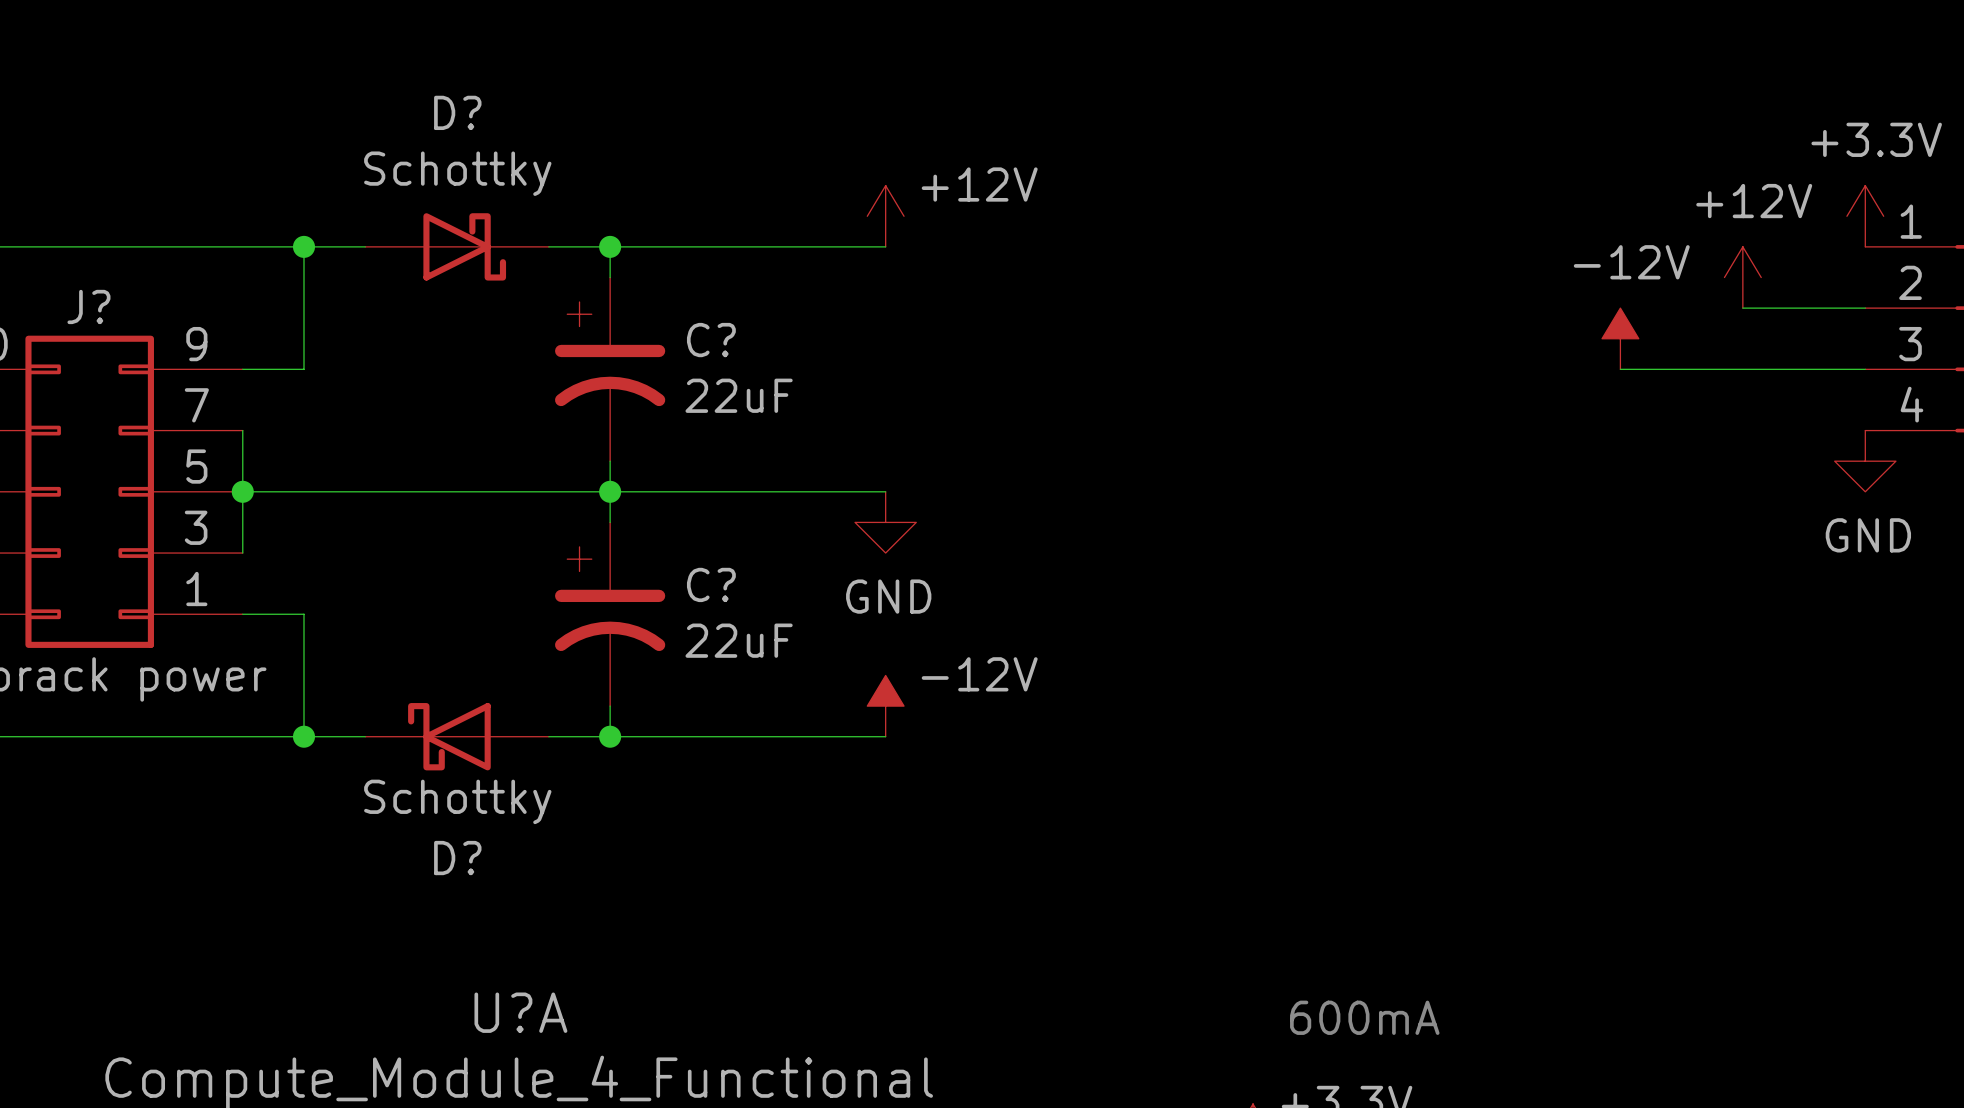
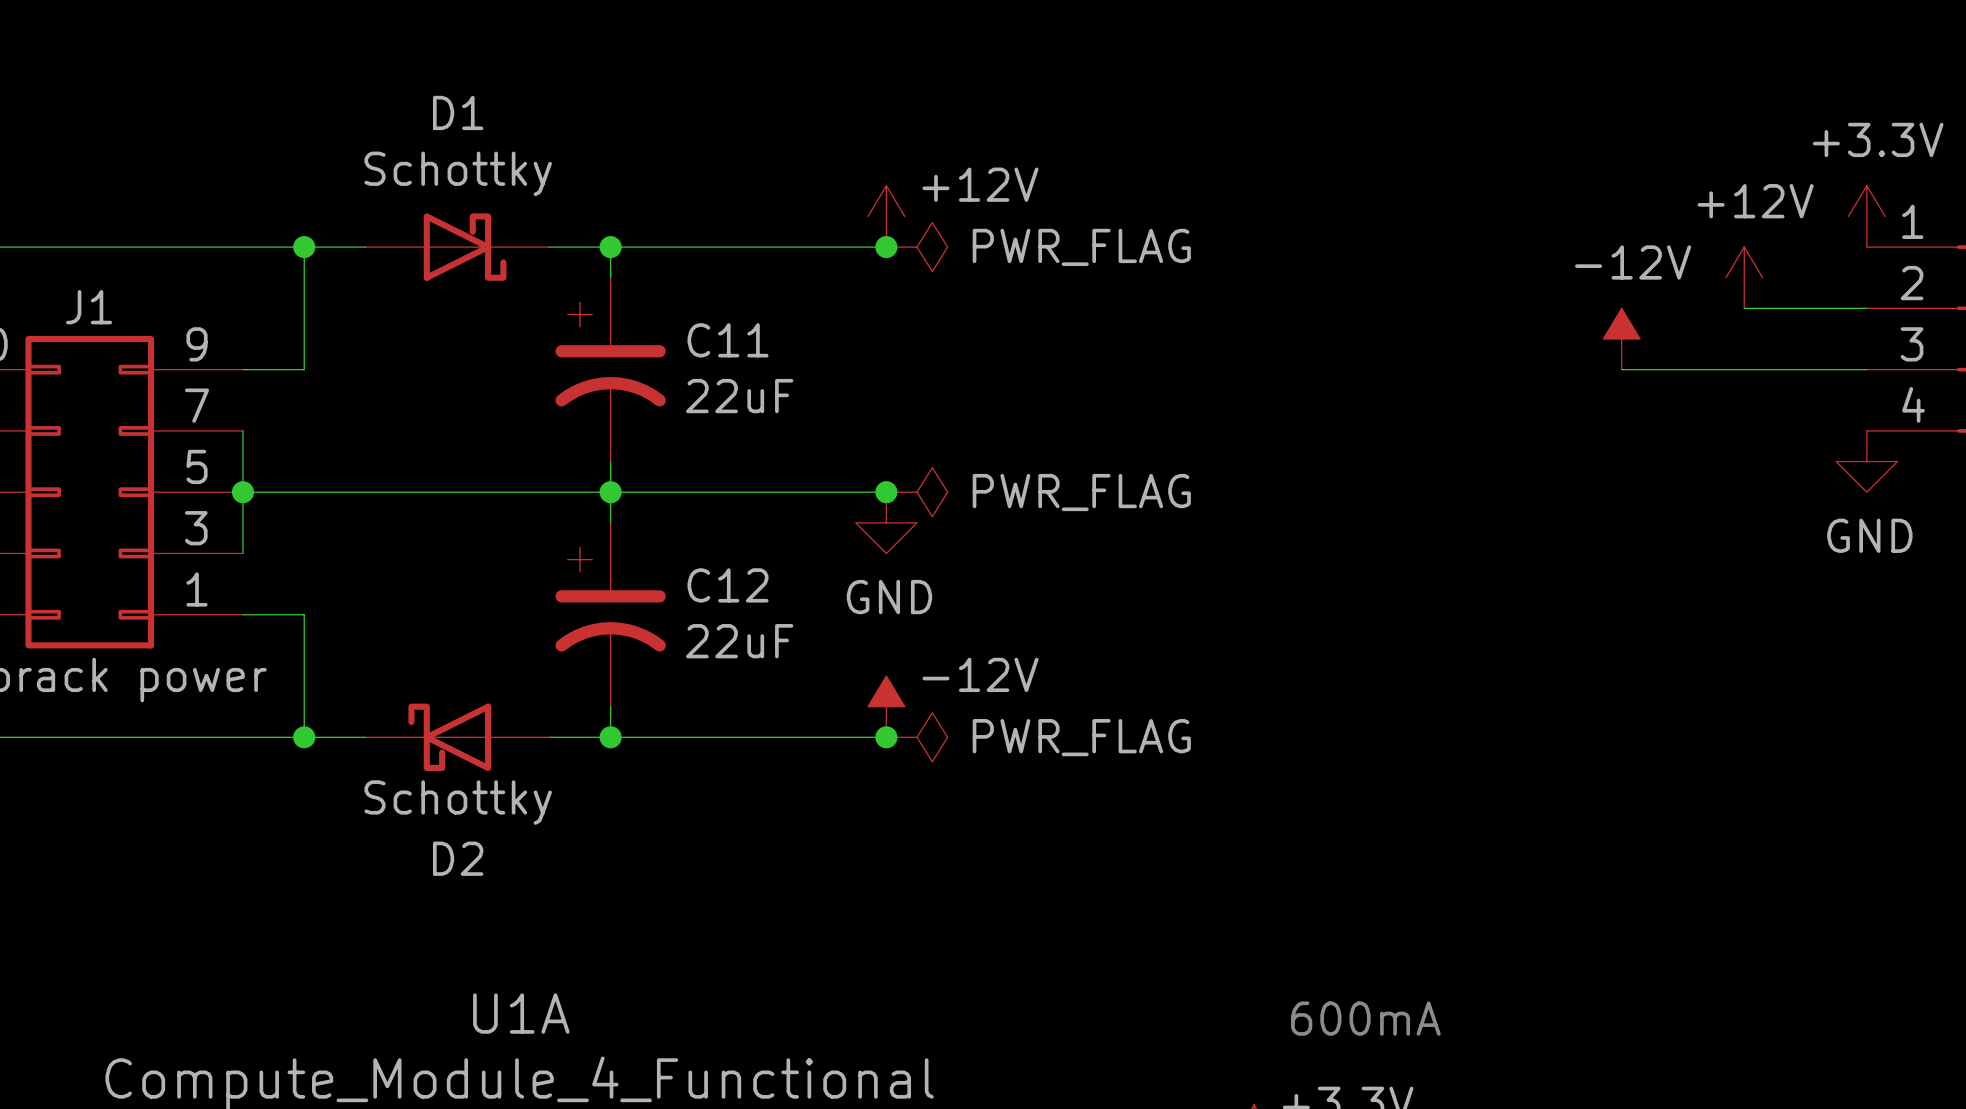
D? name: D? (457, 112) -> D1 (458, 112)
junction: none -> (886, 247)
power symbol: none -> PWR_FLAG (917, 247)
J? name: J? (88, 306) -> J1 (89, 307)
C? name: C? (711, 340) -> C11 (728, 340)
junction: none -> (886, 492)
power symbol: none -> PWR_FLAG (917, 492)
C? name: C? (711, 584) -> C12 (728, 585)
junction: none -> (886, 737)
power symbol: none -> PWR_FLAG (917, 737)
D? name: D? (457, 858) -> D2 (458, 858)
U?A name: U?A (520, 1012) -> U1A (521, 1013)

